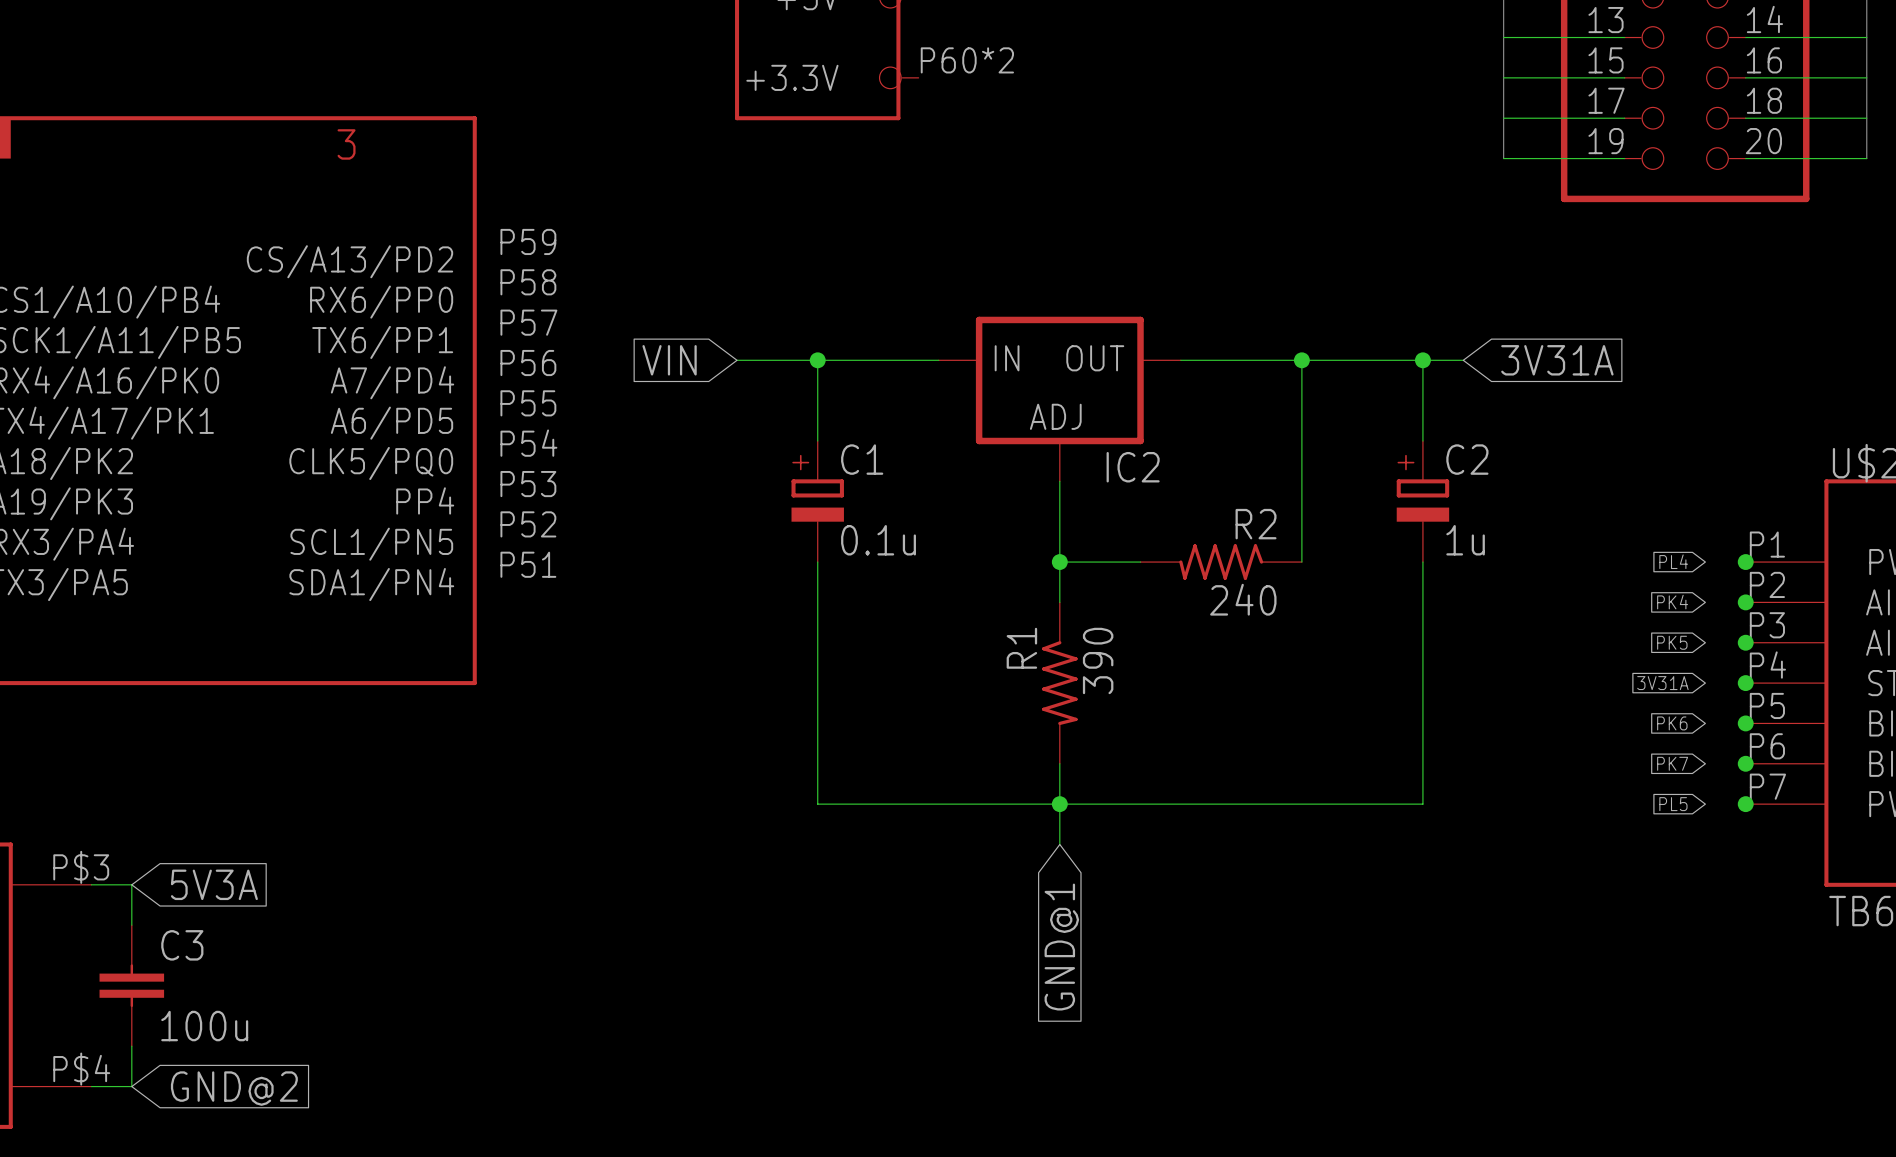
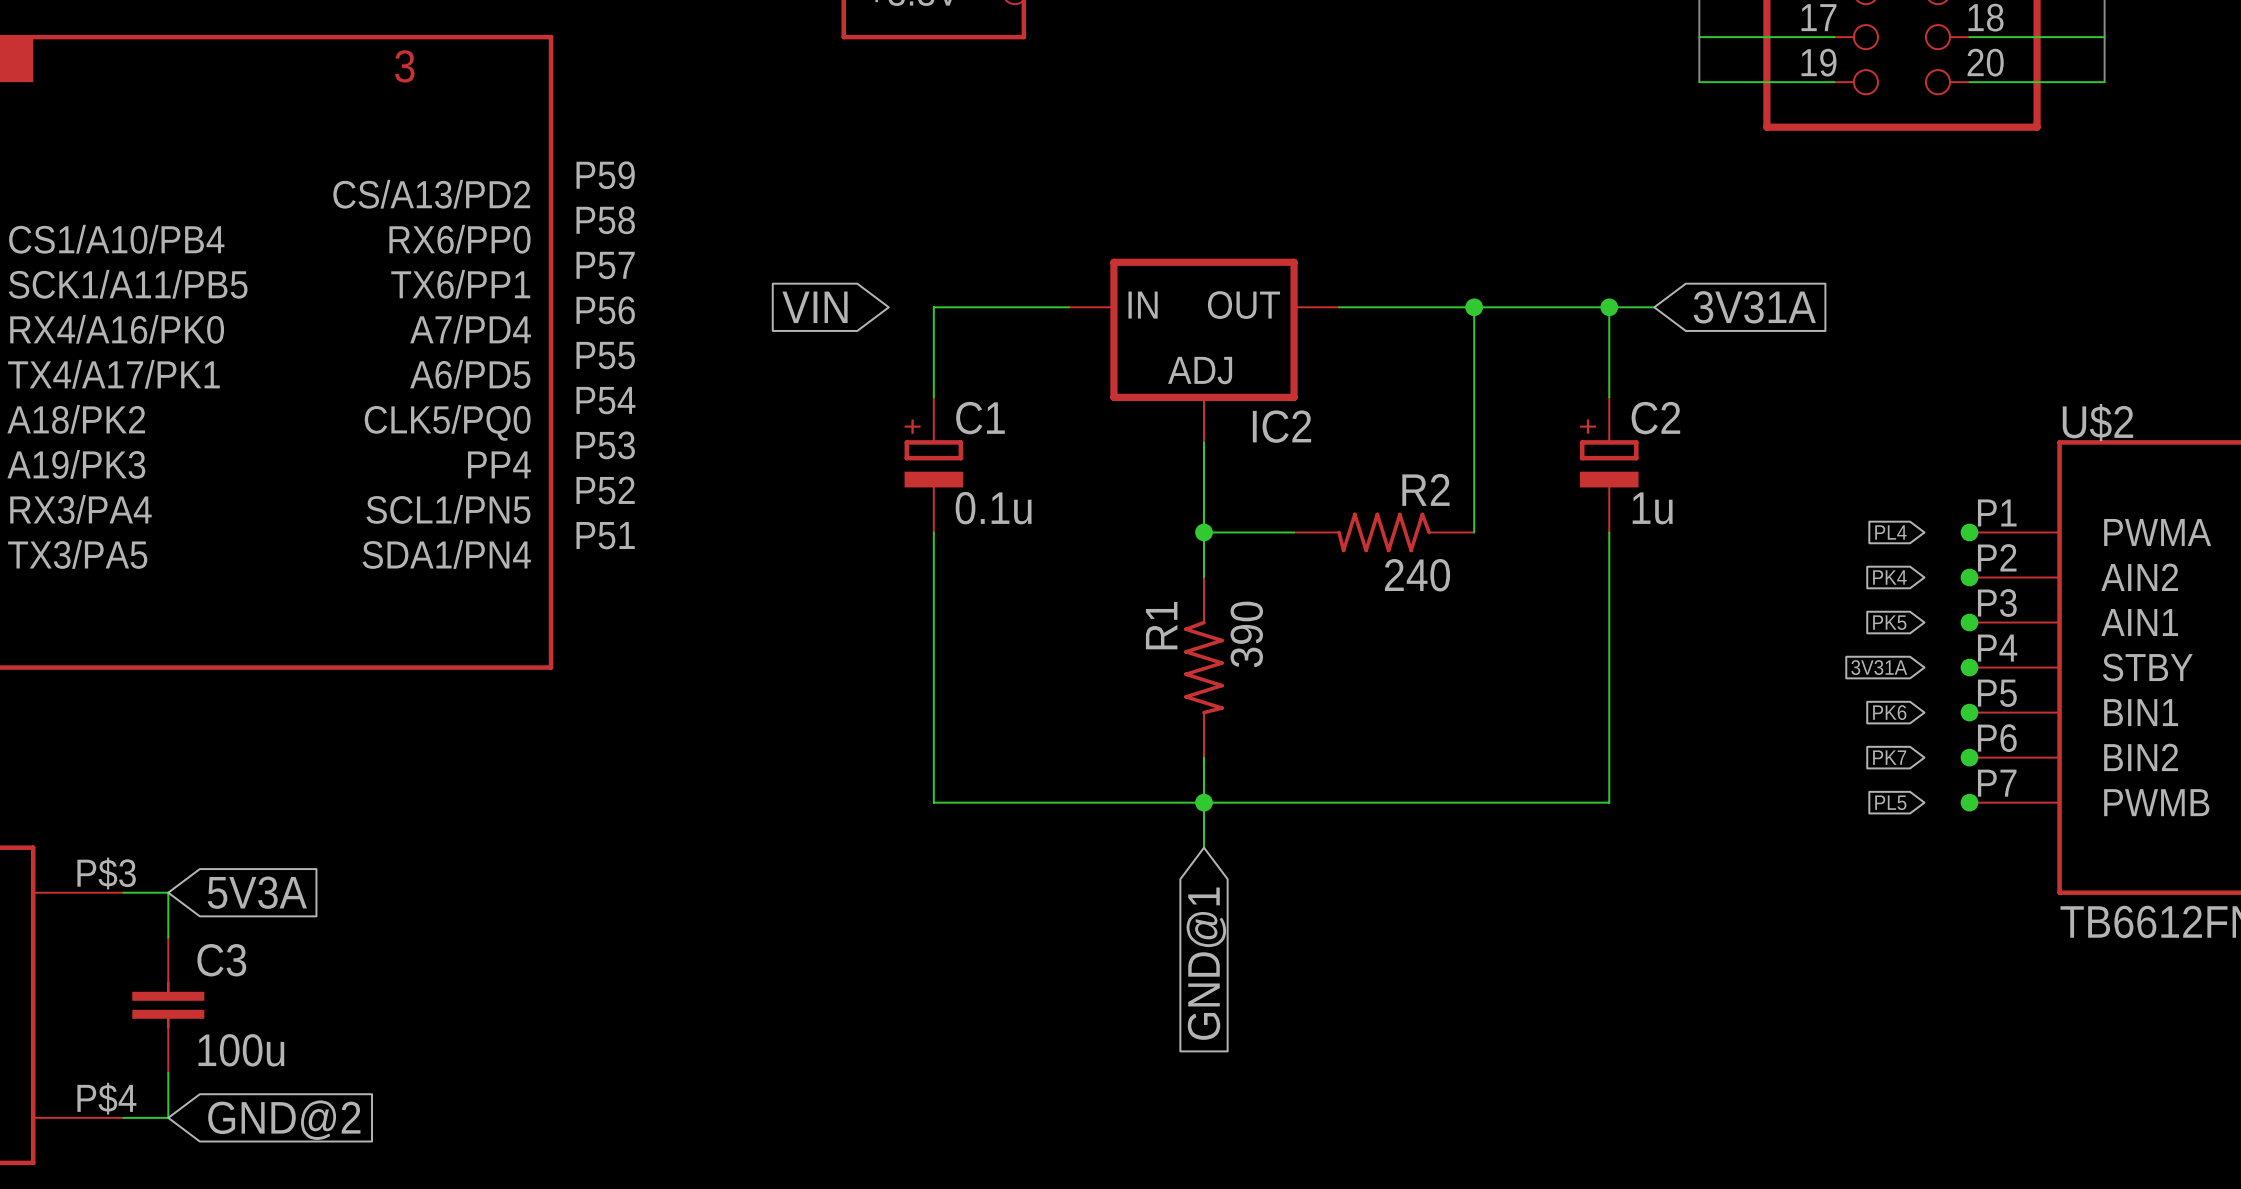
global label position: VIN (669, 360) -> VIN (815, 307)
wire: (737, 360) (817, 360) -> none
junction: (817, 360) -> none

